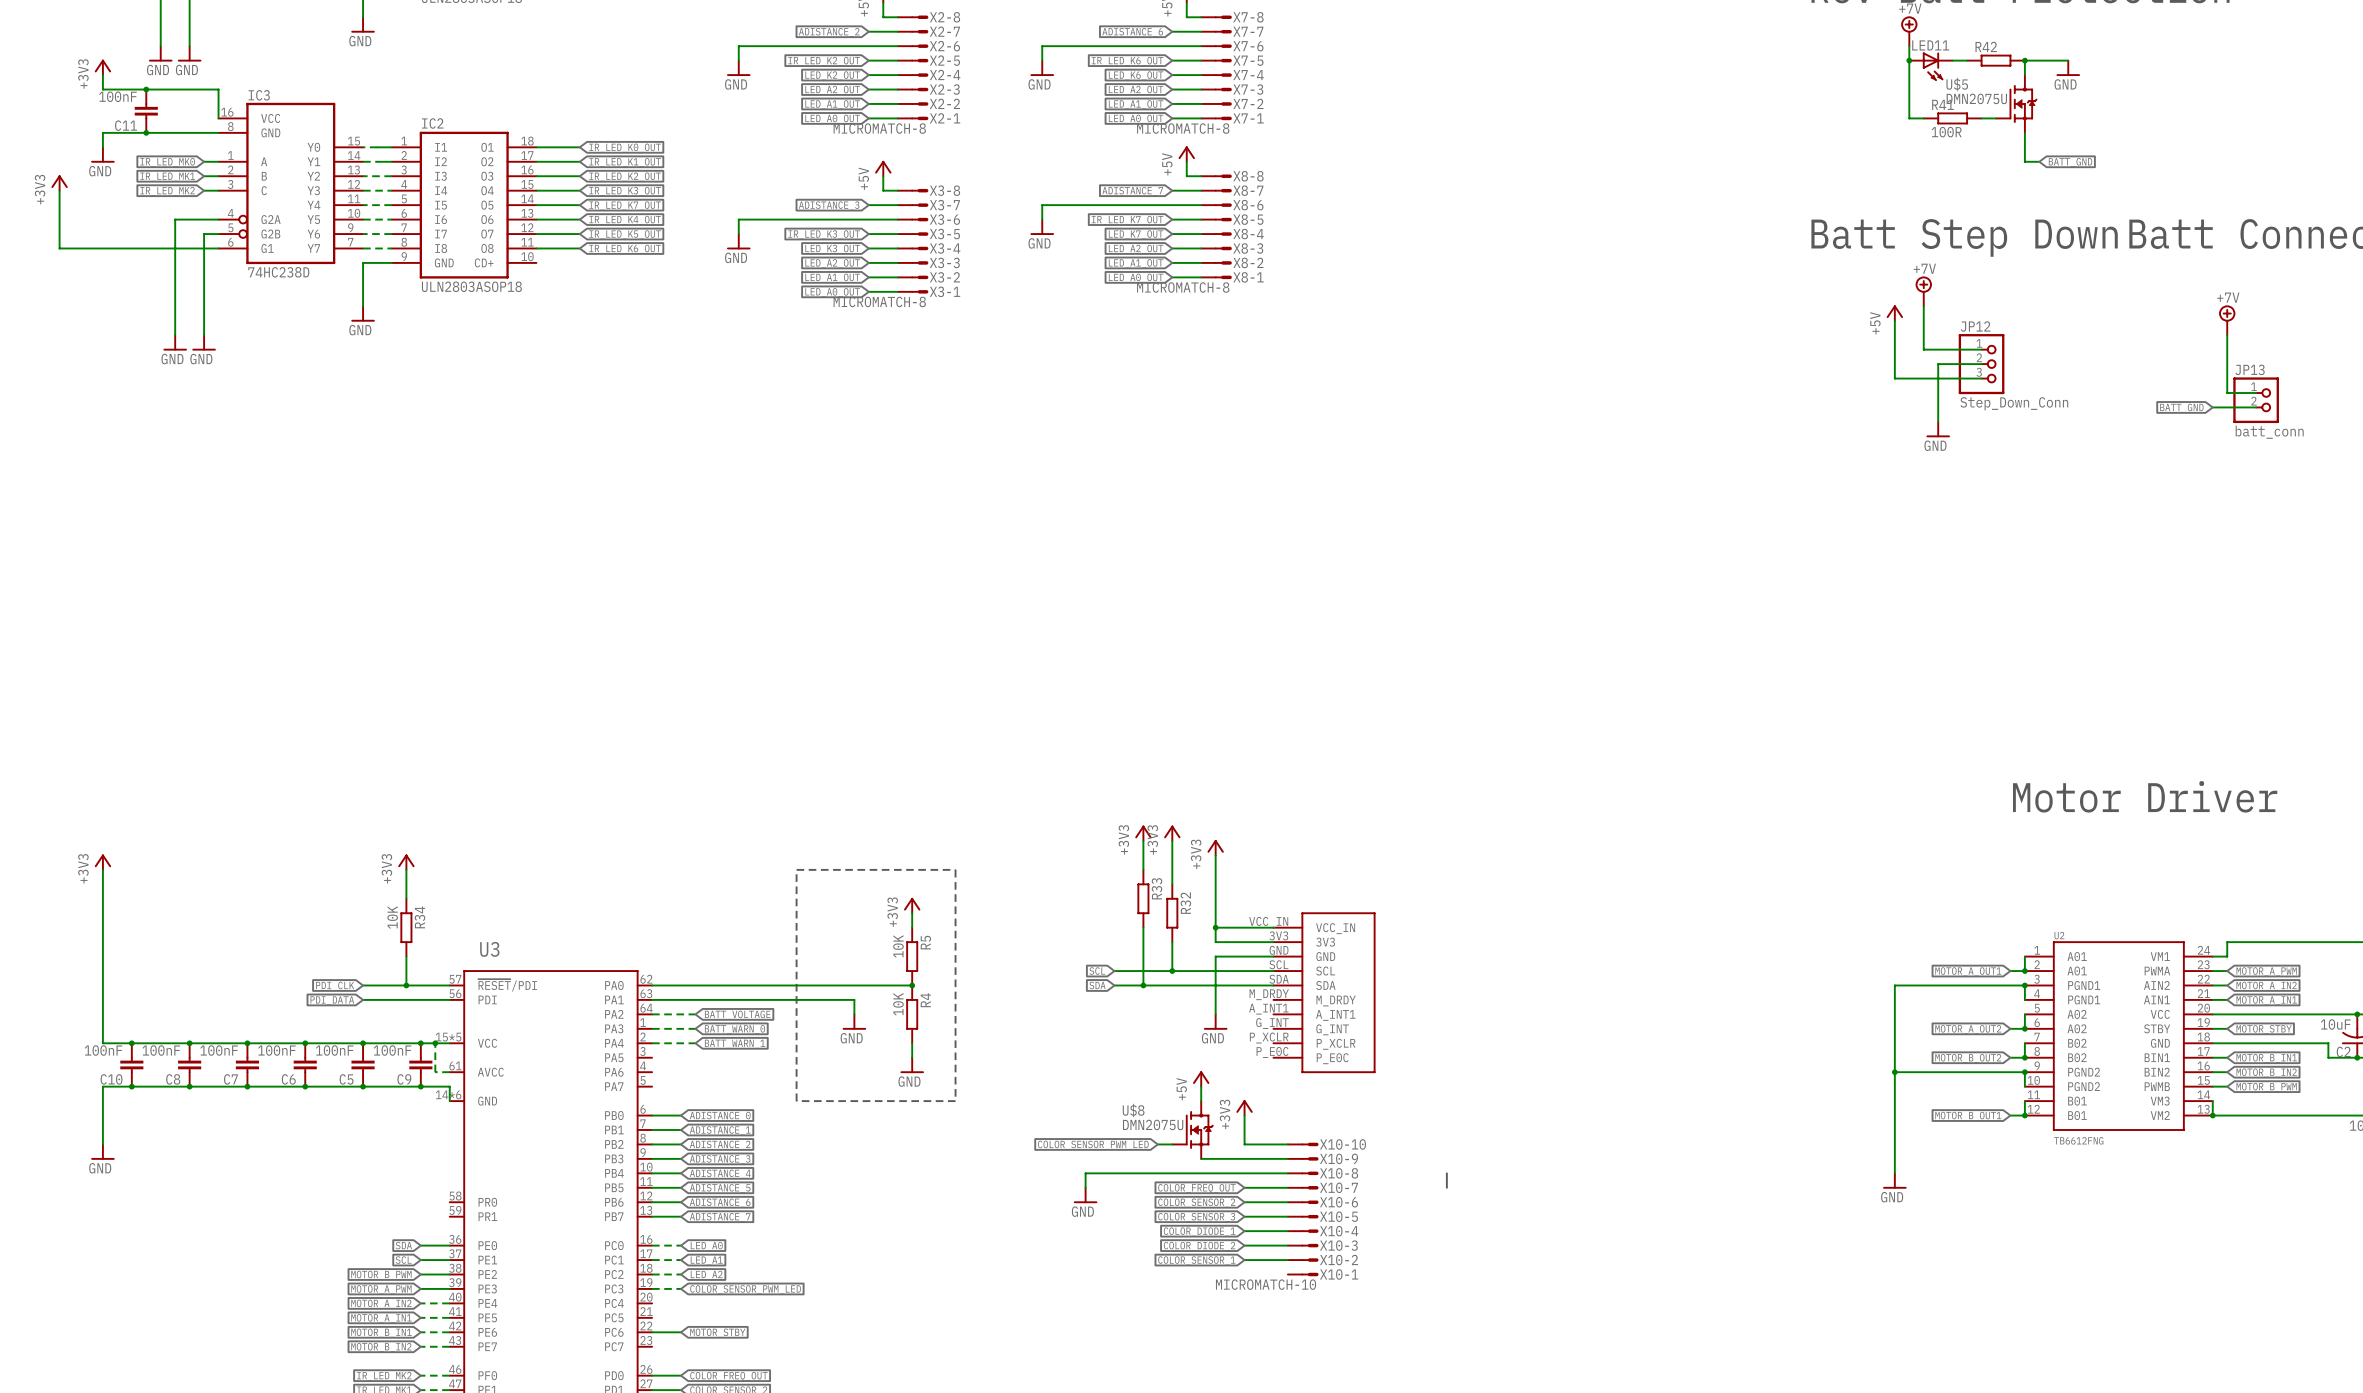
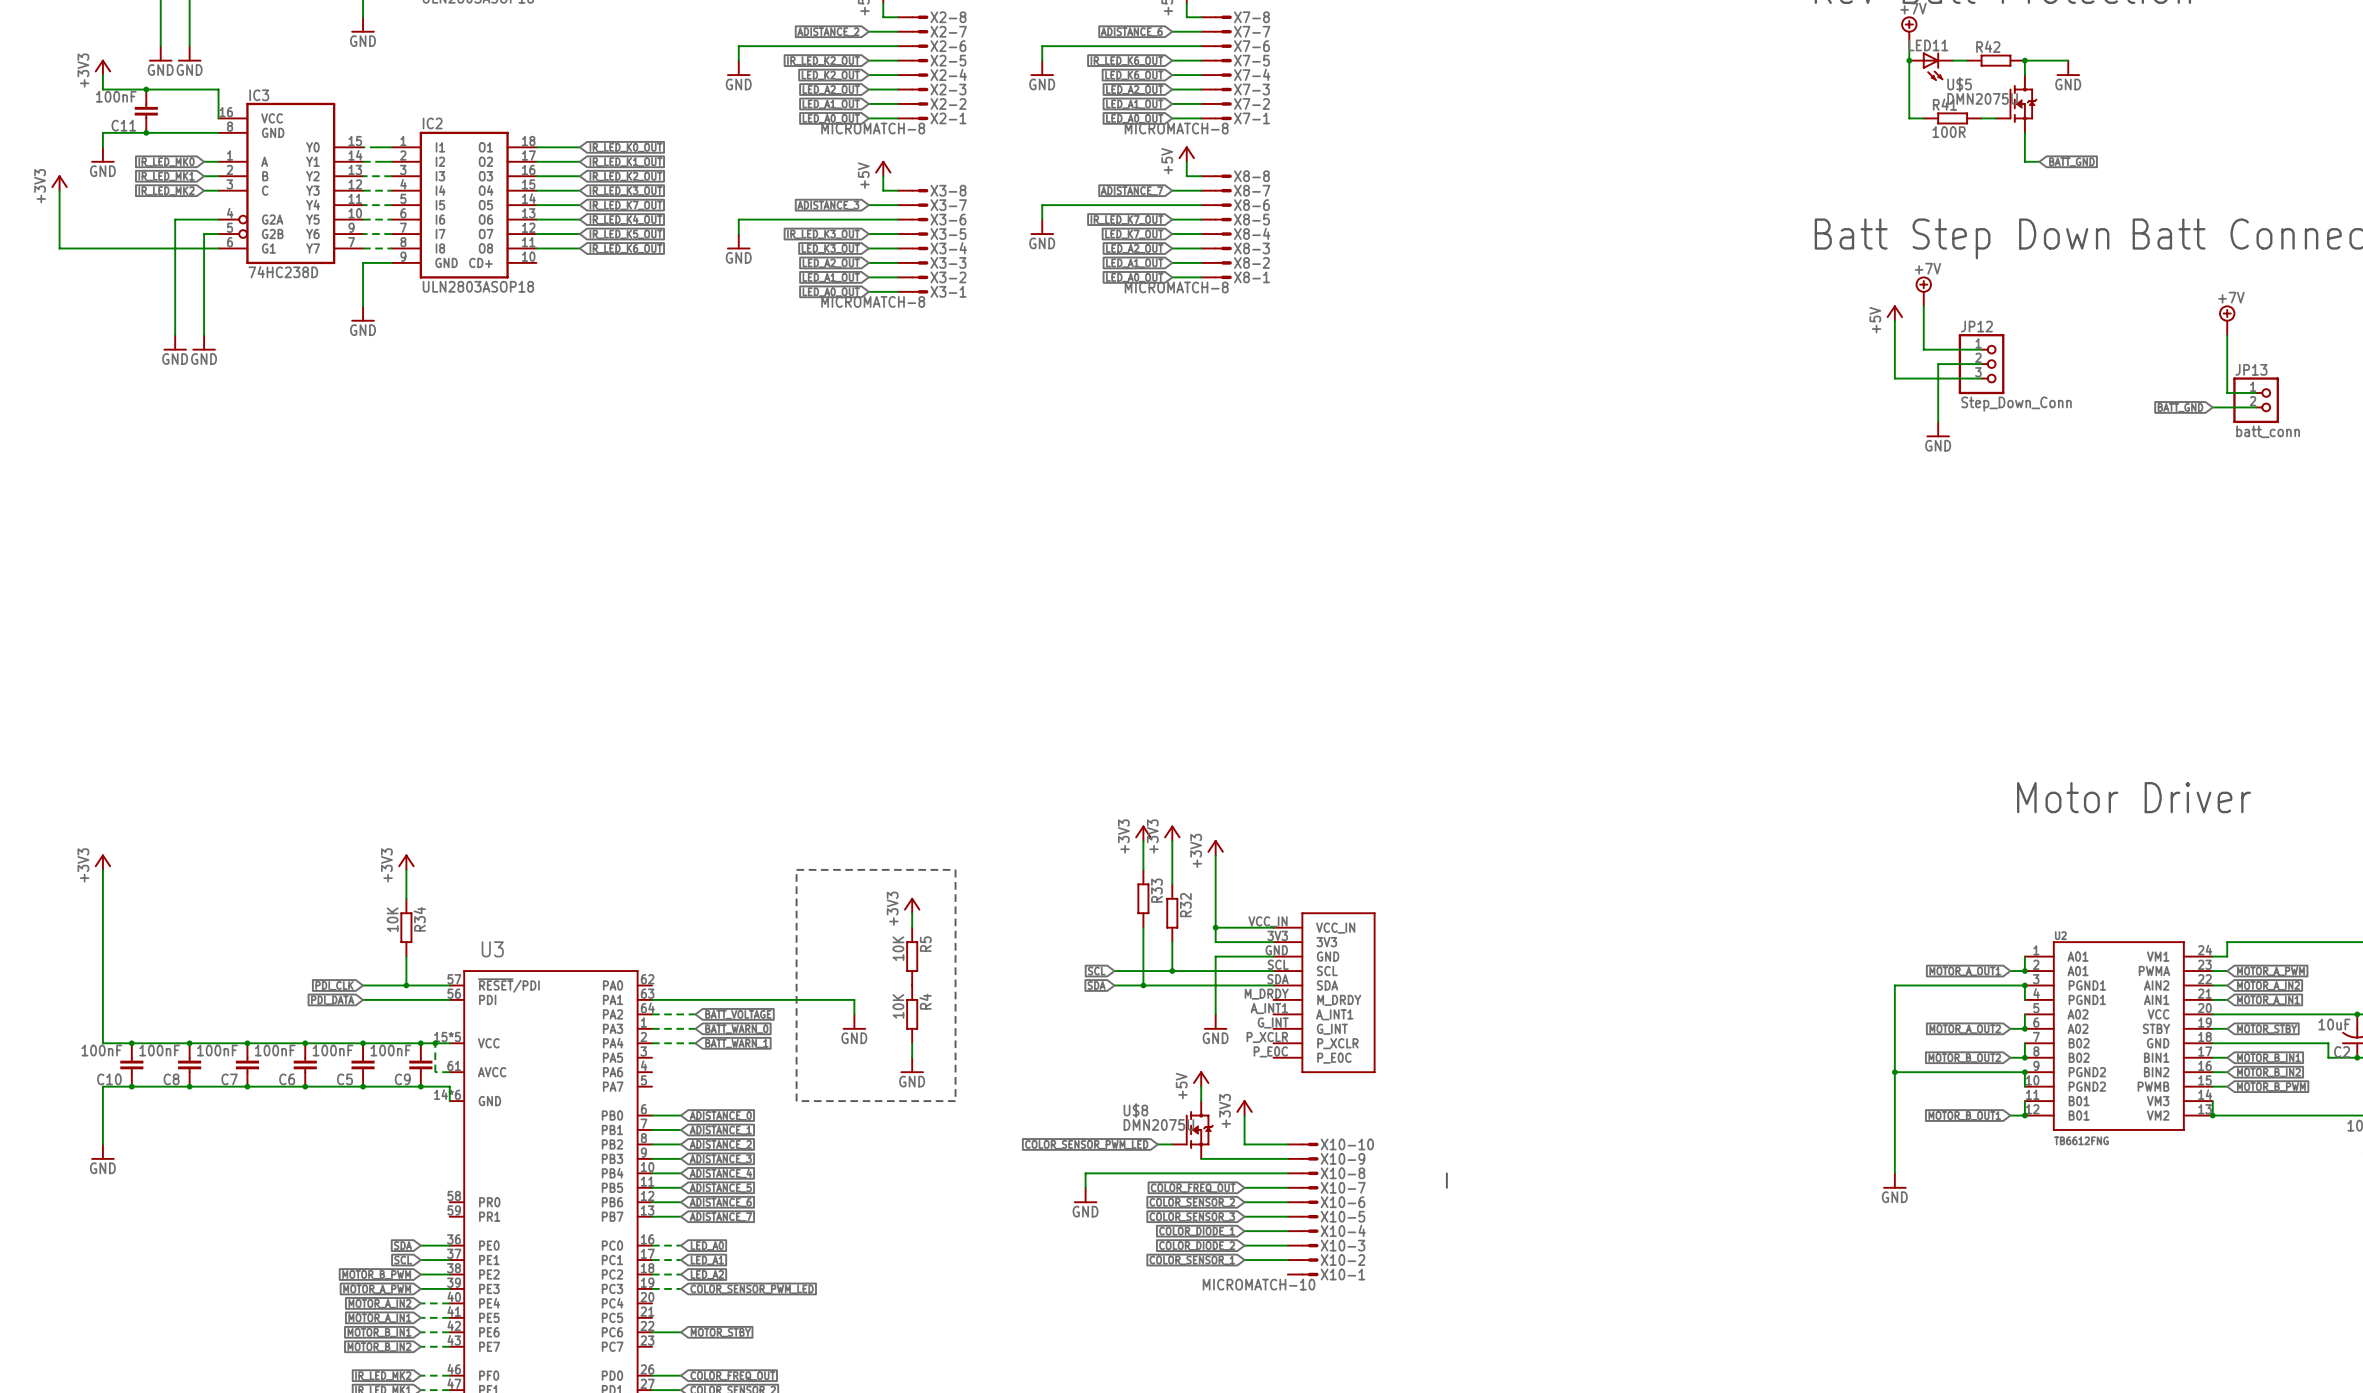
wire: (652, 985) (912, 985) -> none
junction: (912, 985) -> none

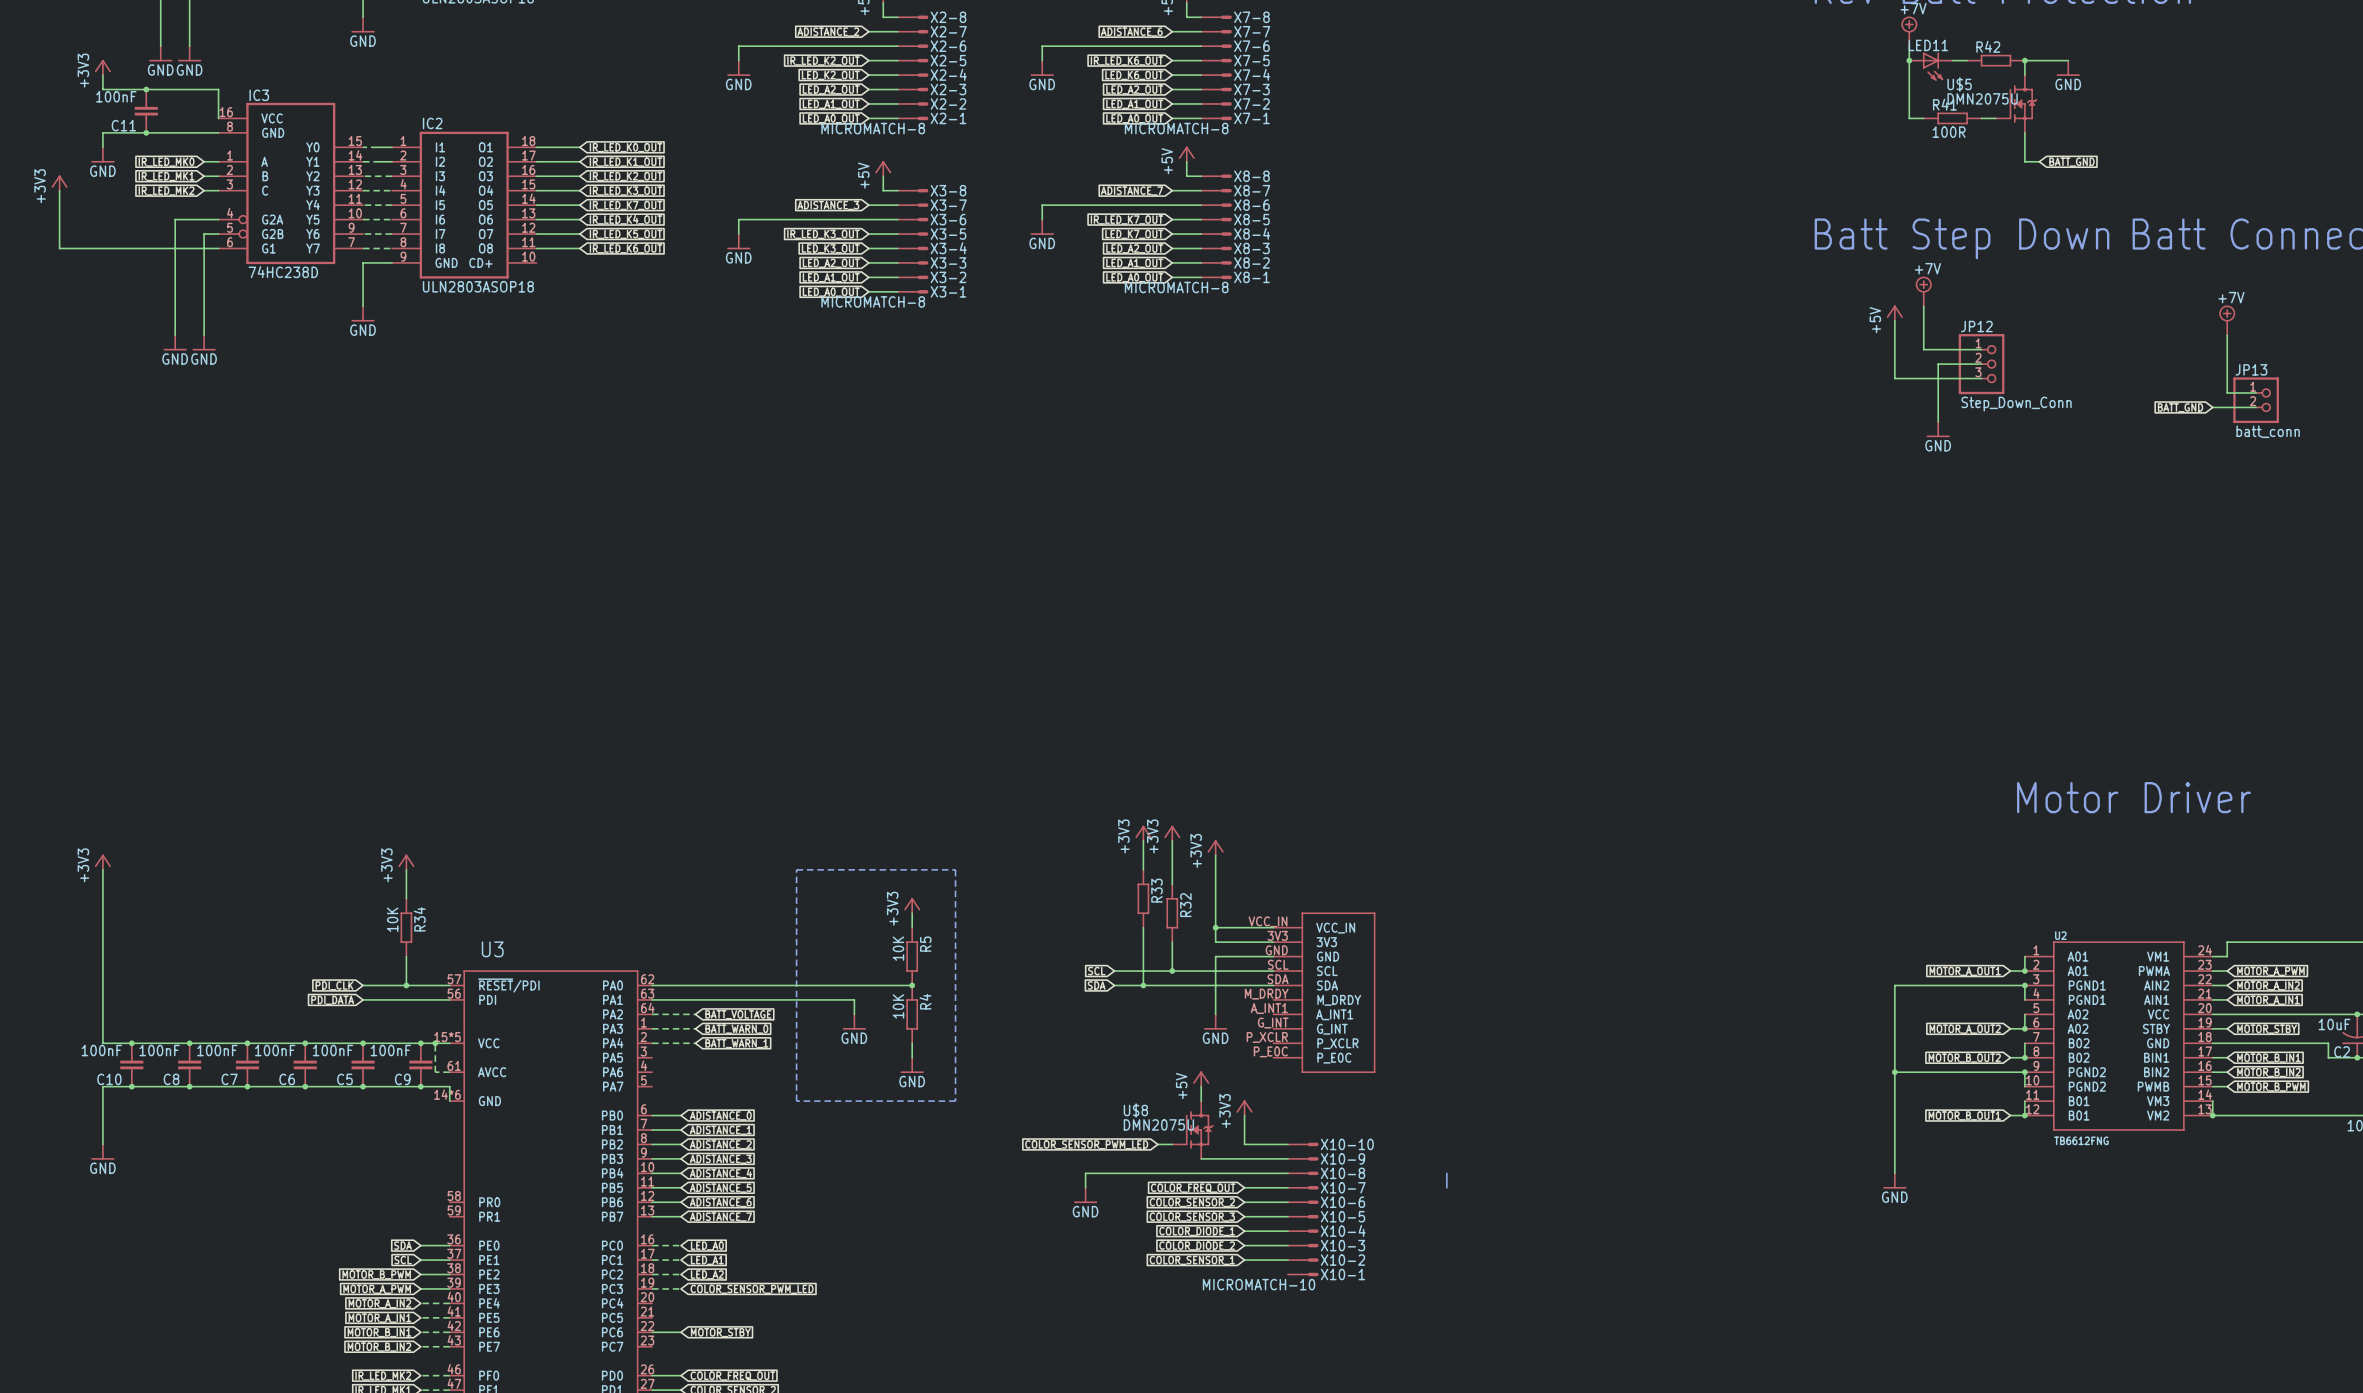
wire: none -> (652, 985) (912, 985)
junction: none -> (912, 985)

